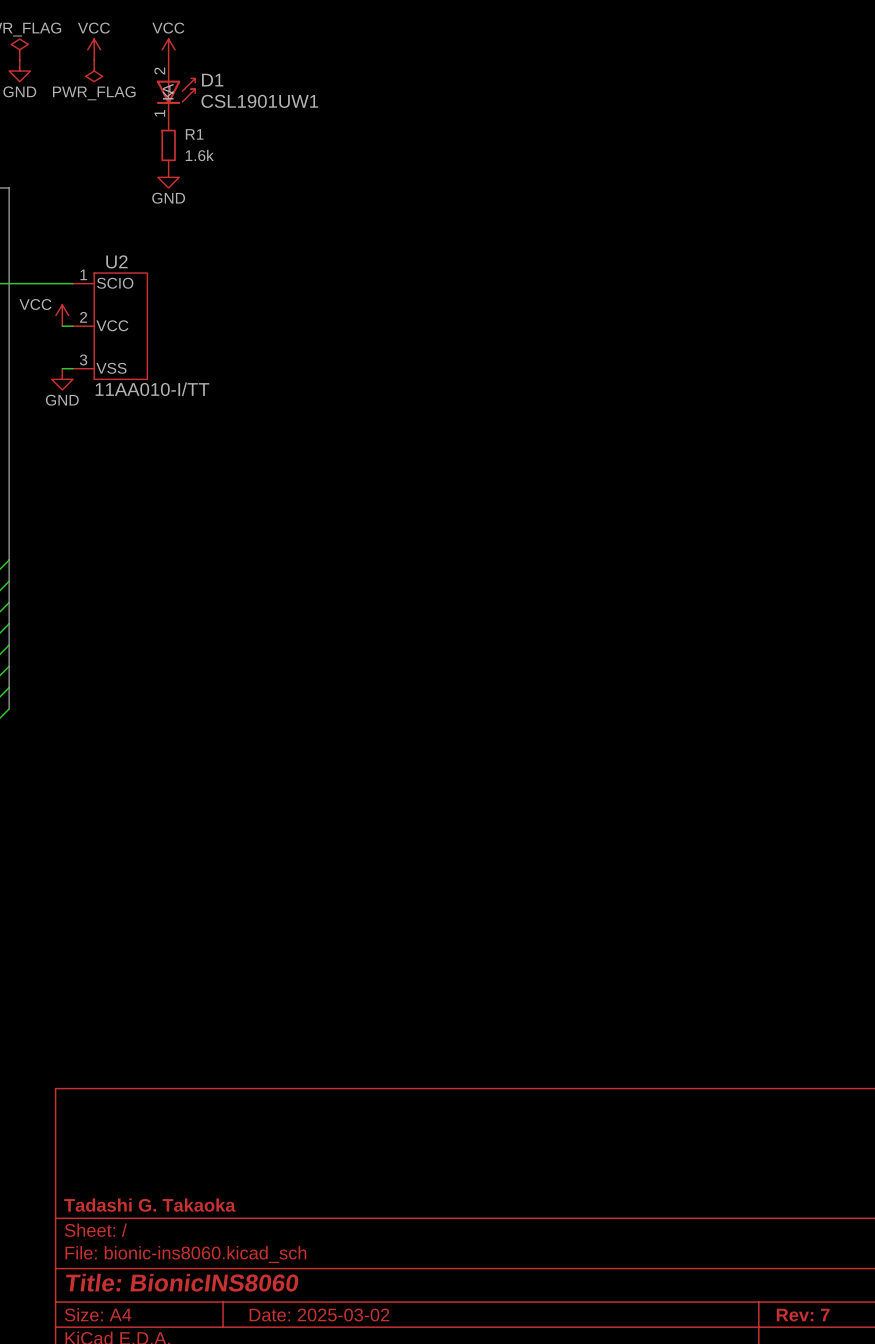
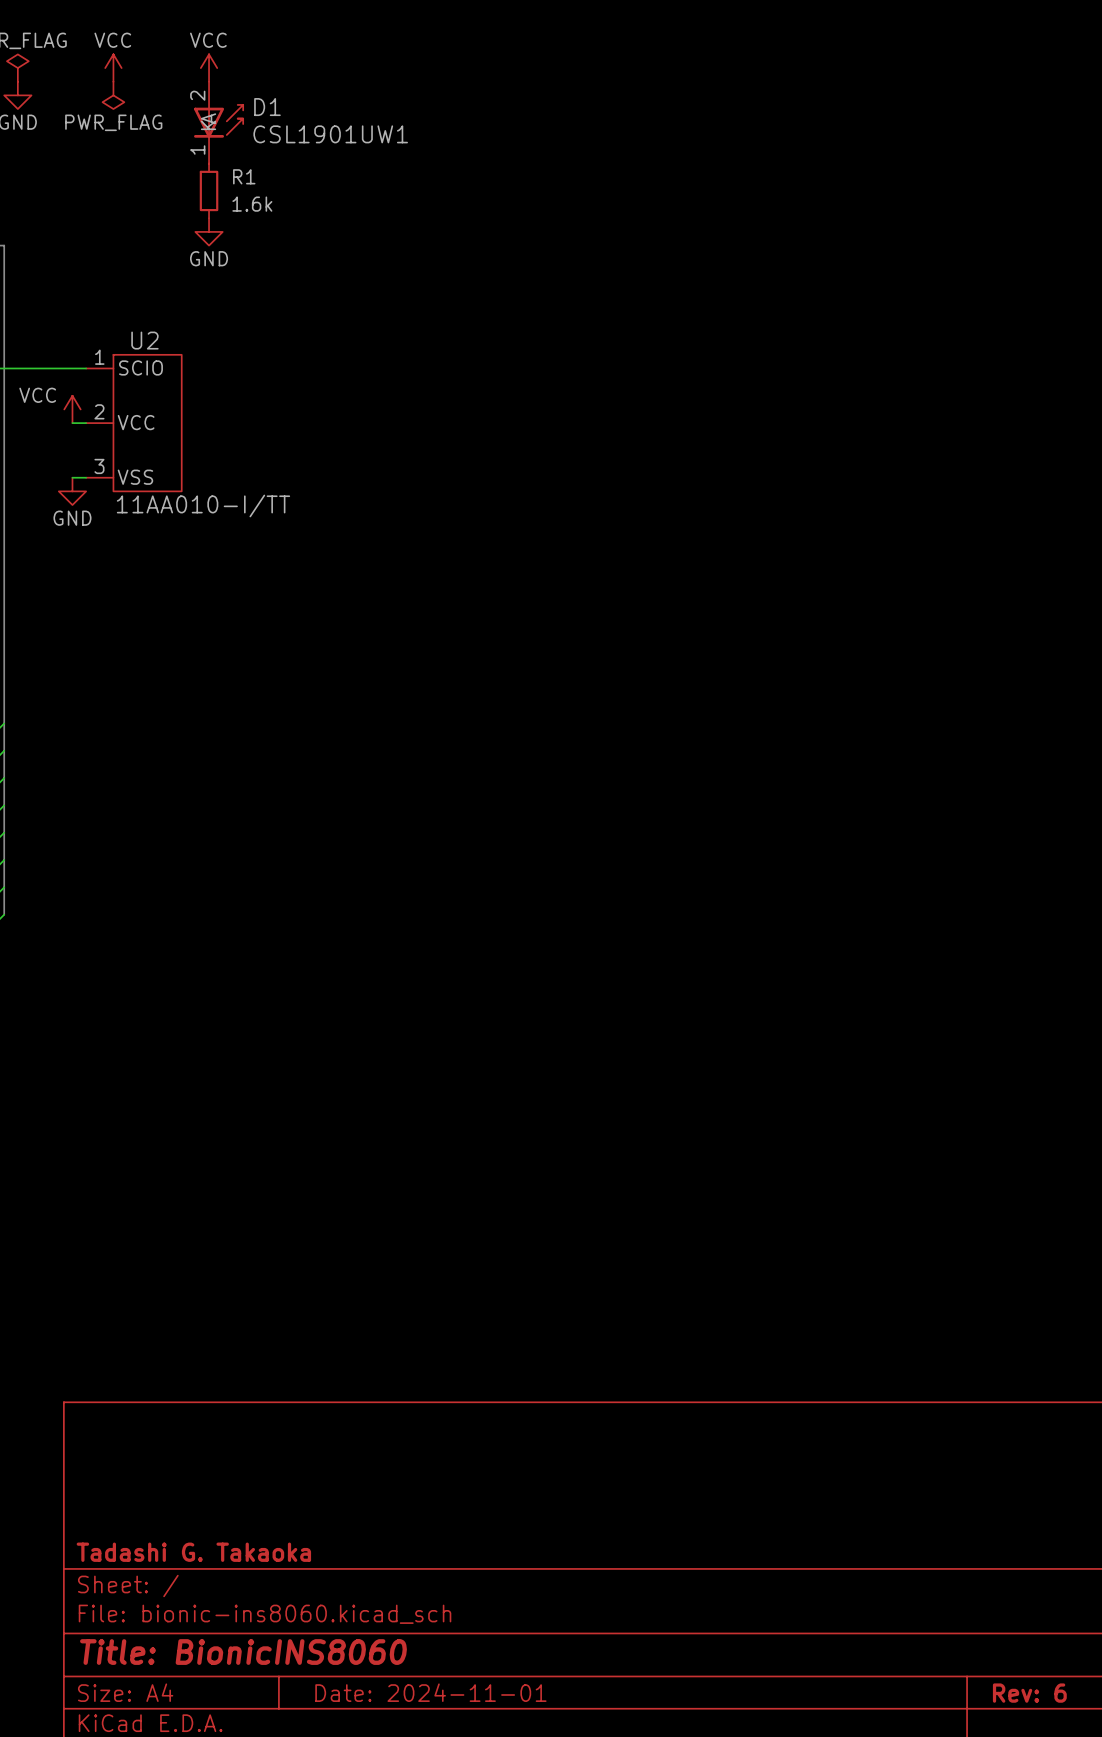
title block: Date: 2025-03-02 (319, 1314) -> Date: 2024-11-01 (430, 1692)
title block: Rev: 7 (803, 1315) -> Rev: 6 (1029, 1693)

